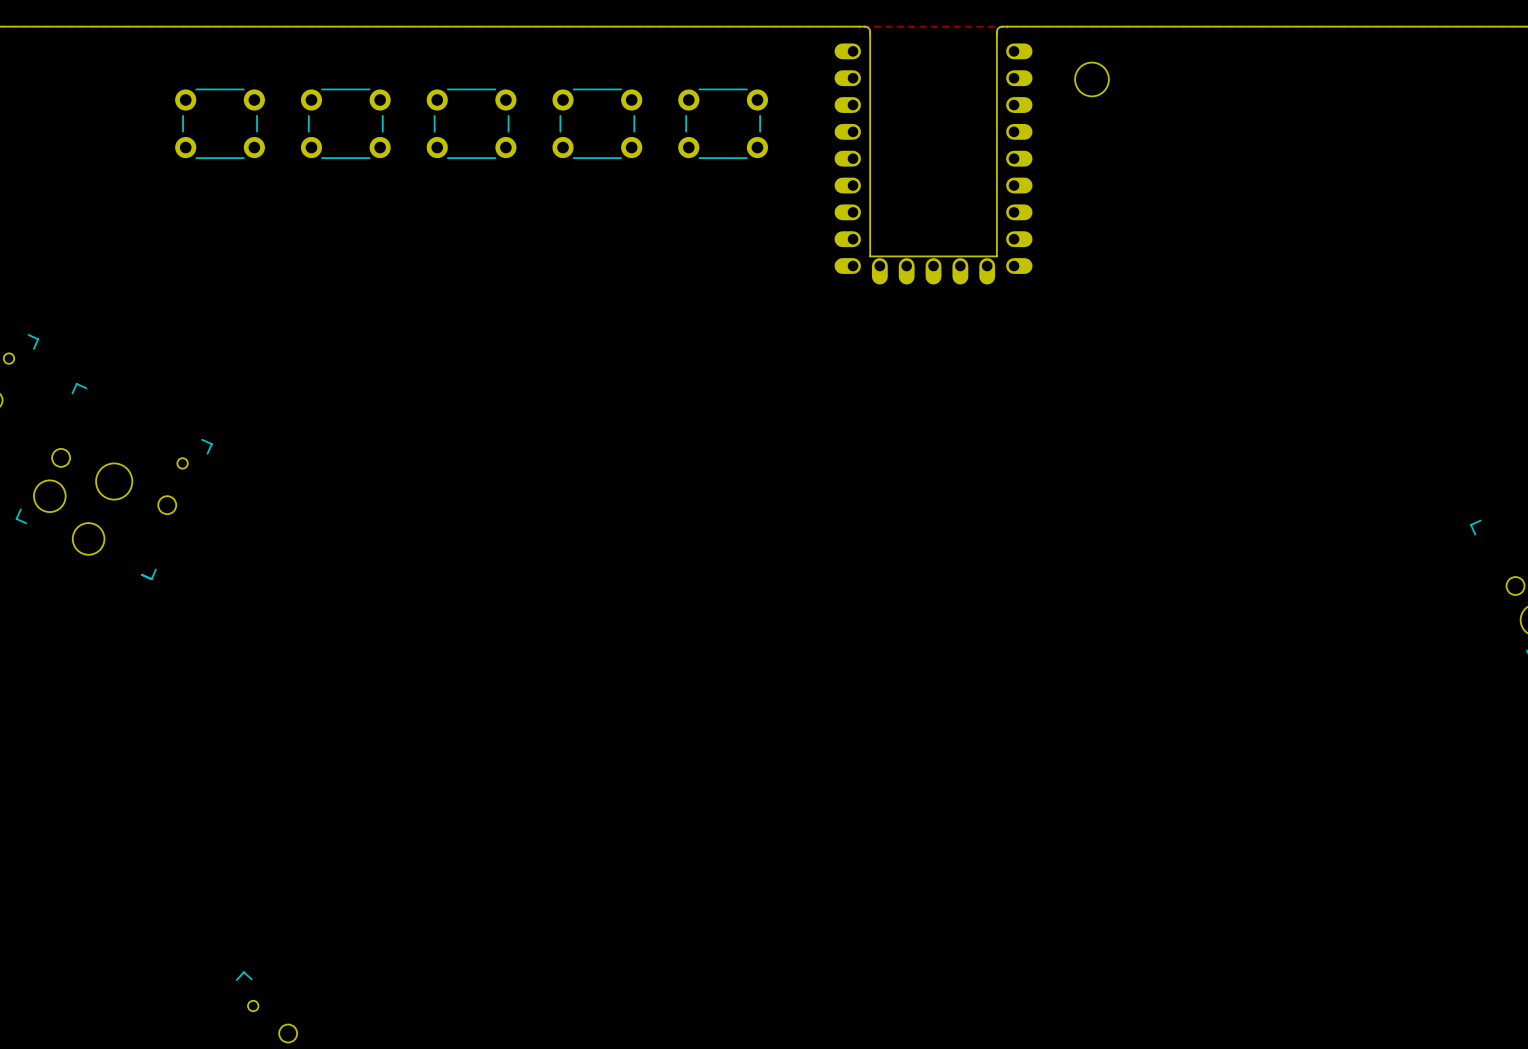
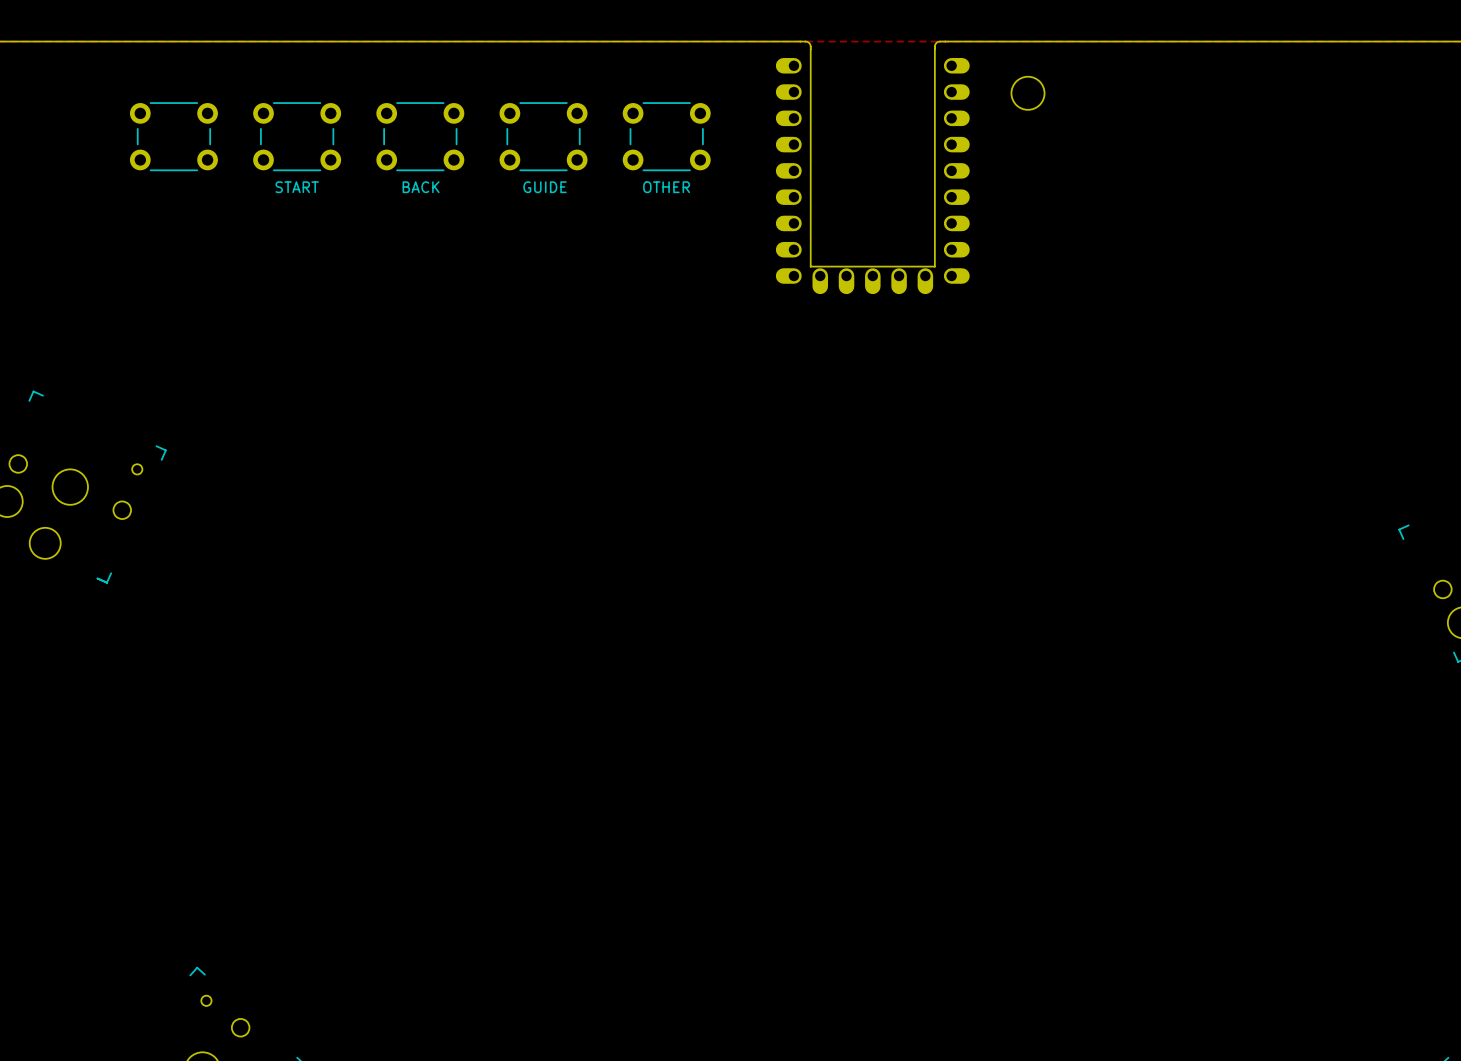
text: none -> START (297, 187)
text: none -> BACK (421, 187)
text: none -> GUIDE (545, 187)
text: none -> OTHER (666, 187)

